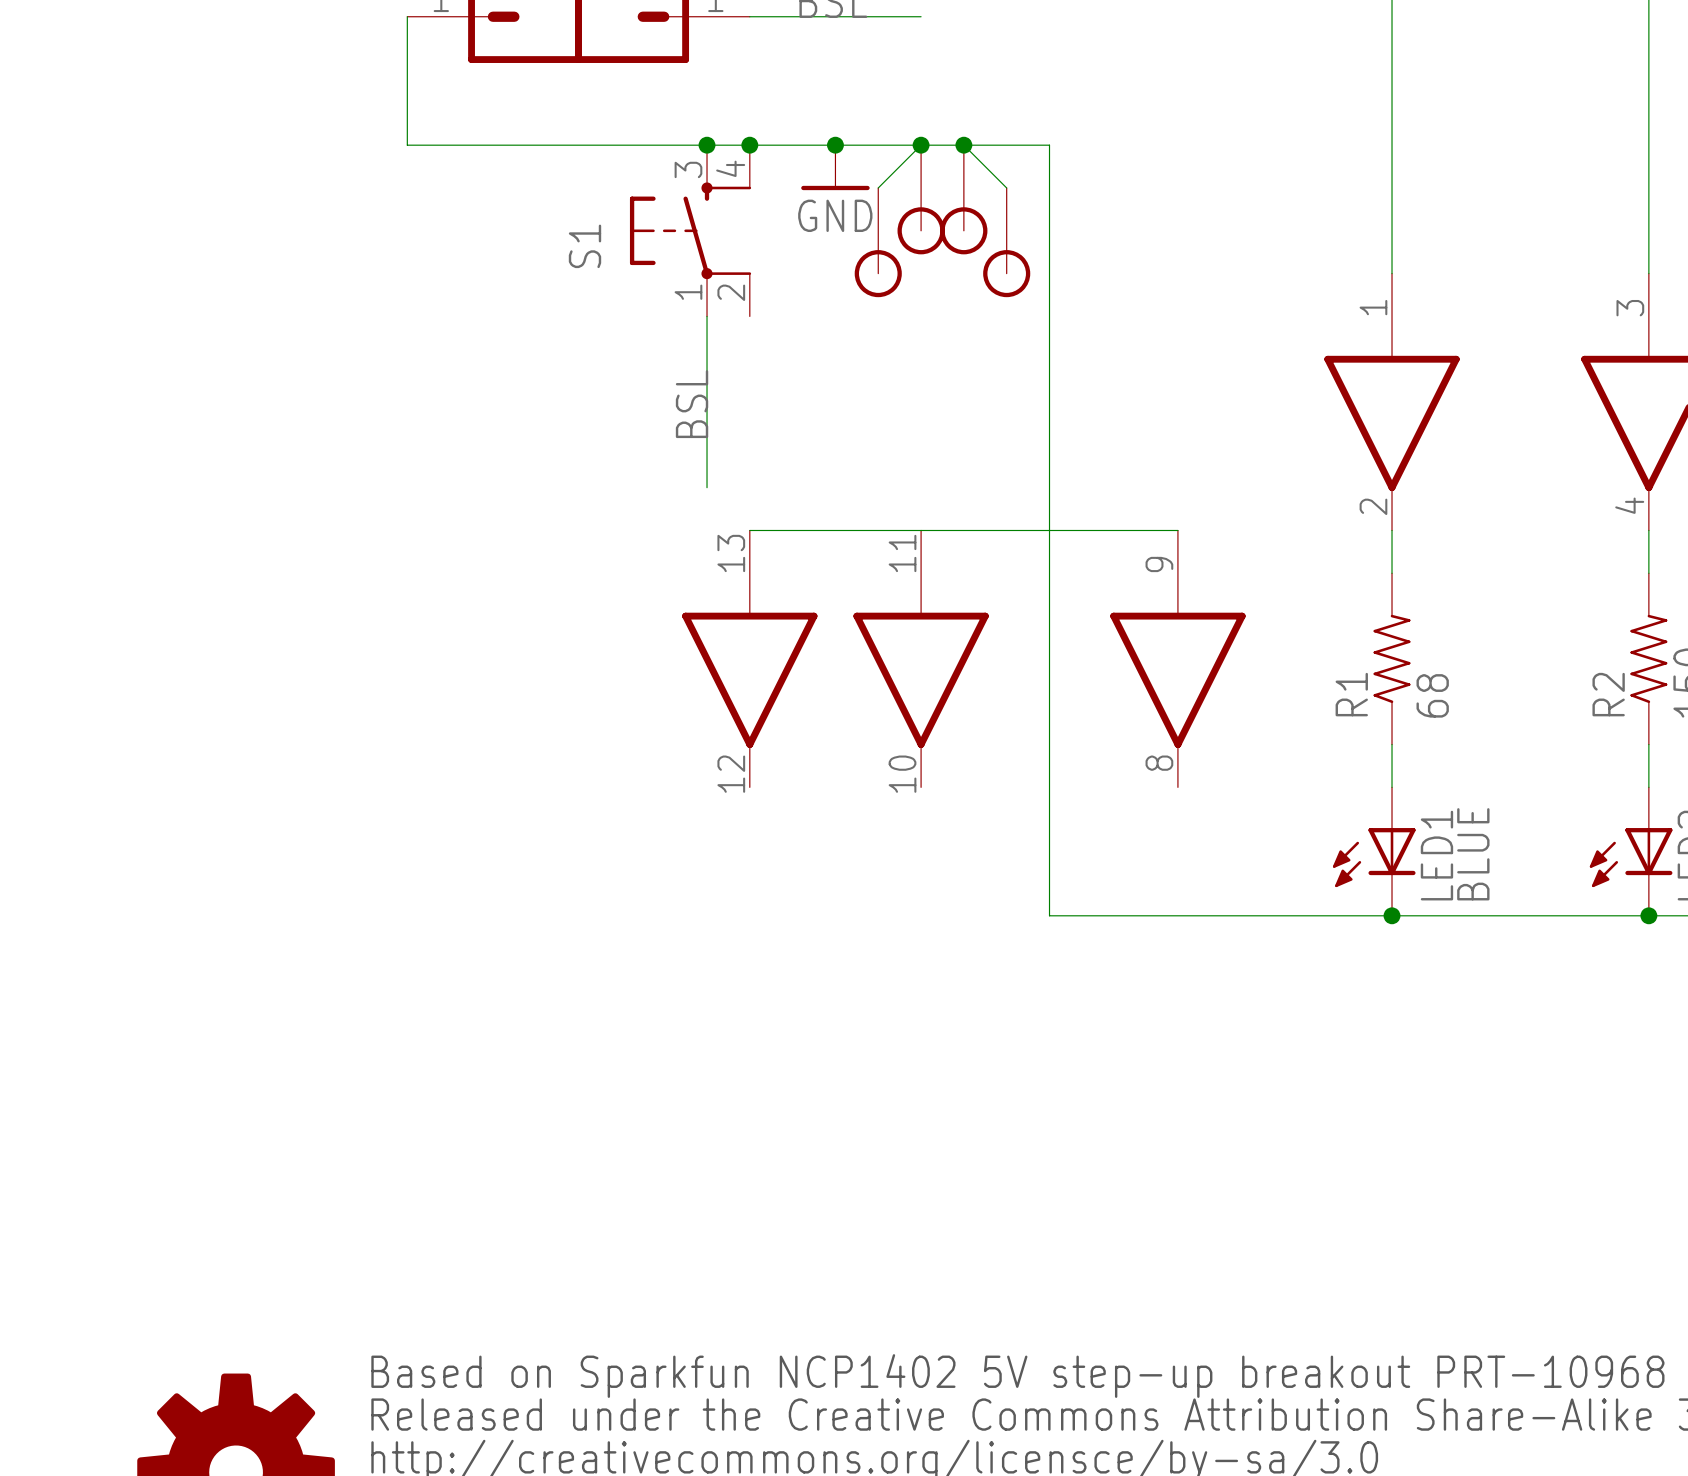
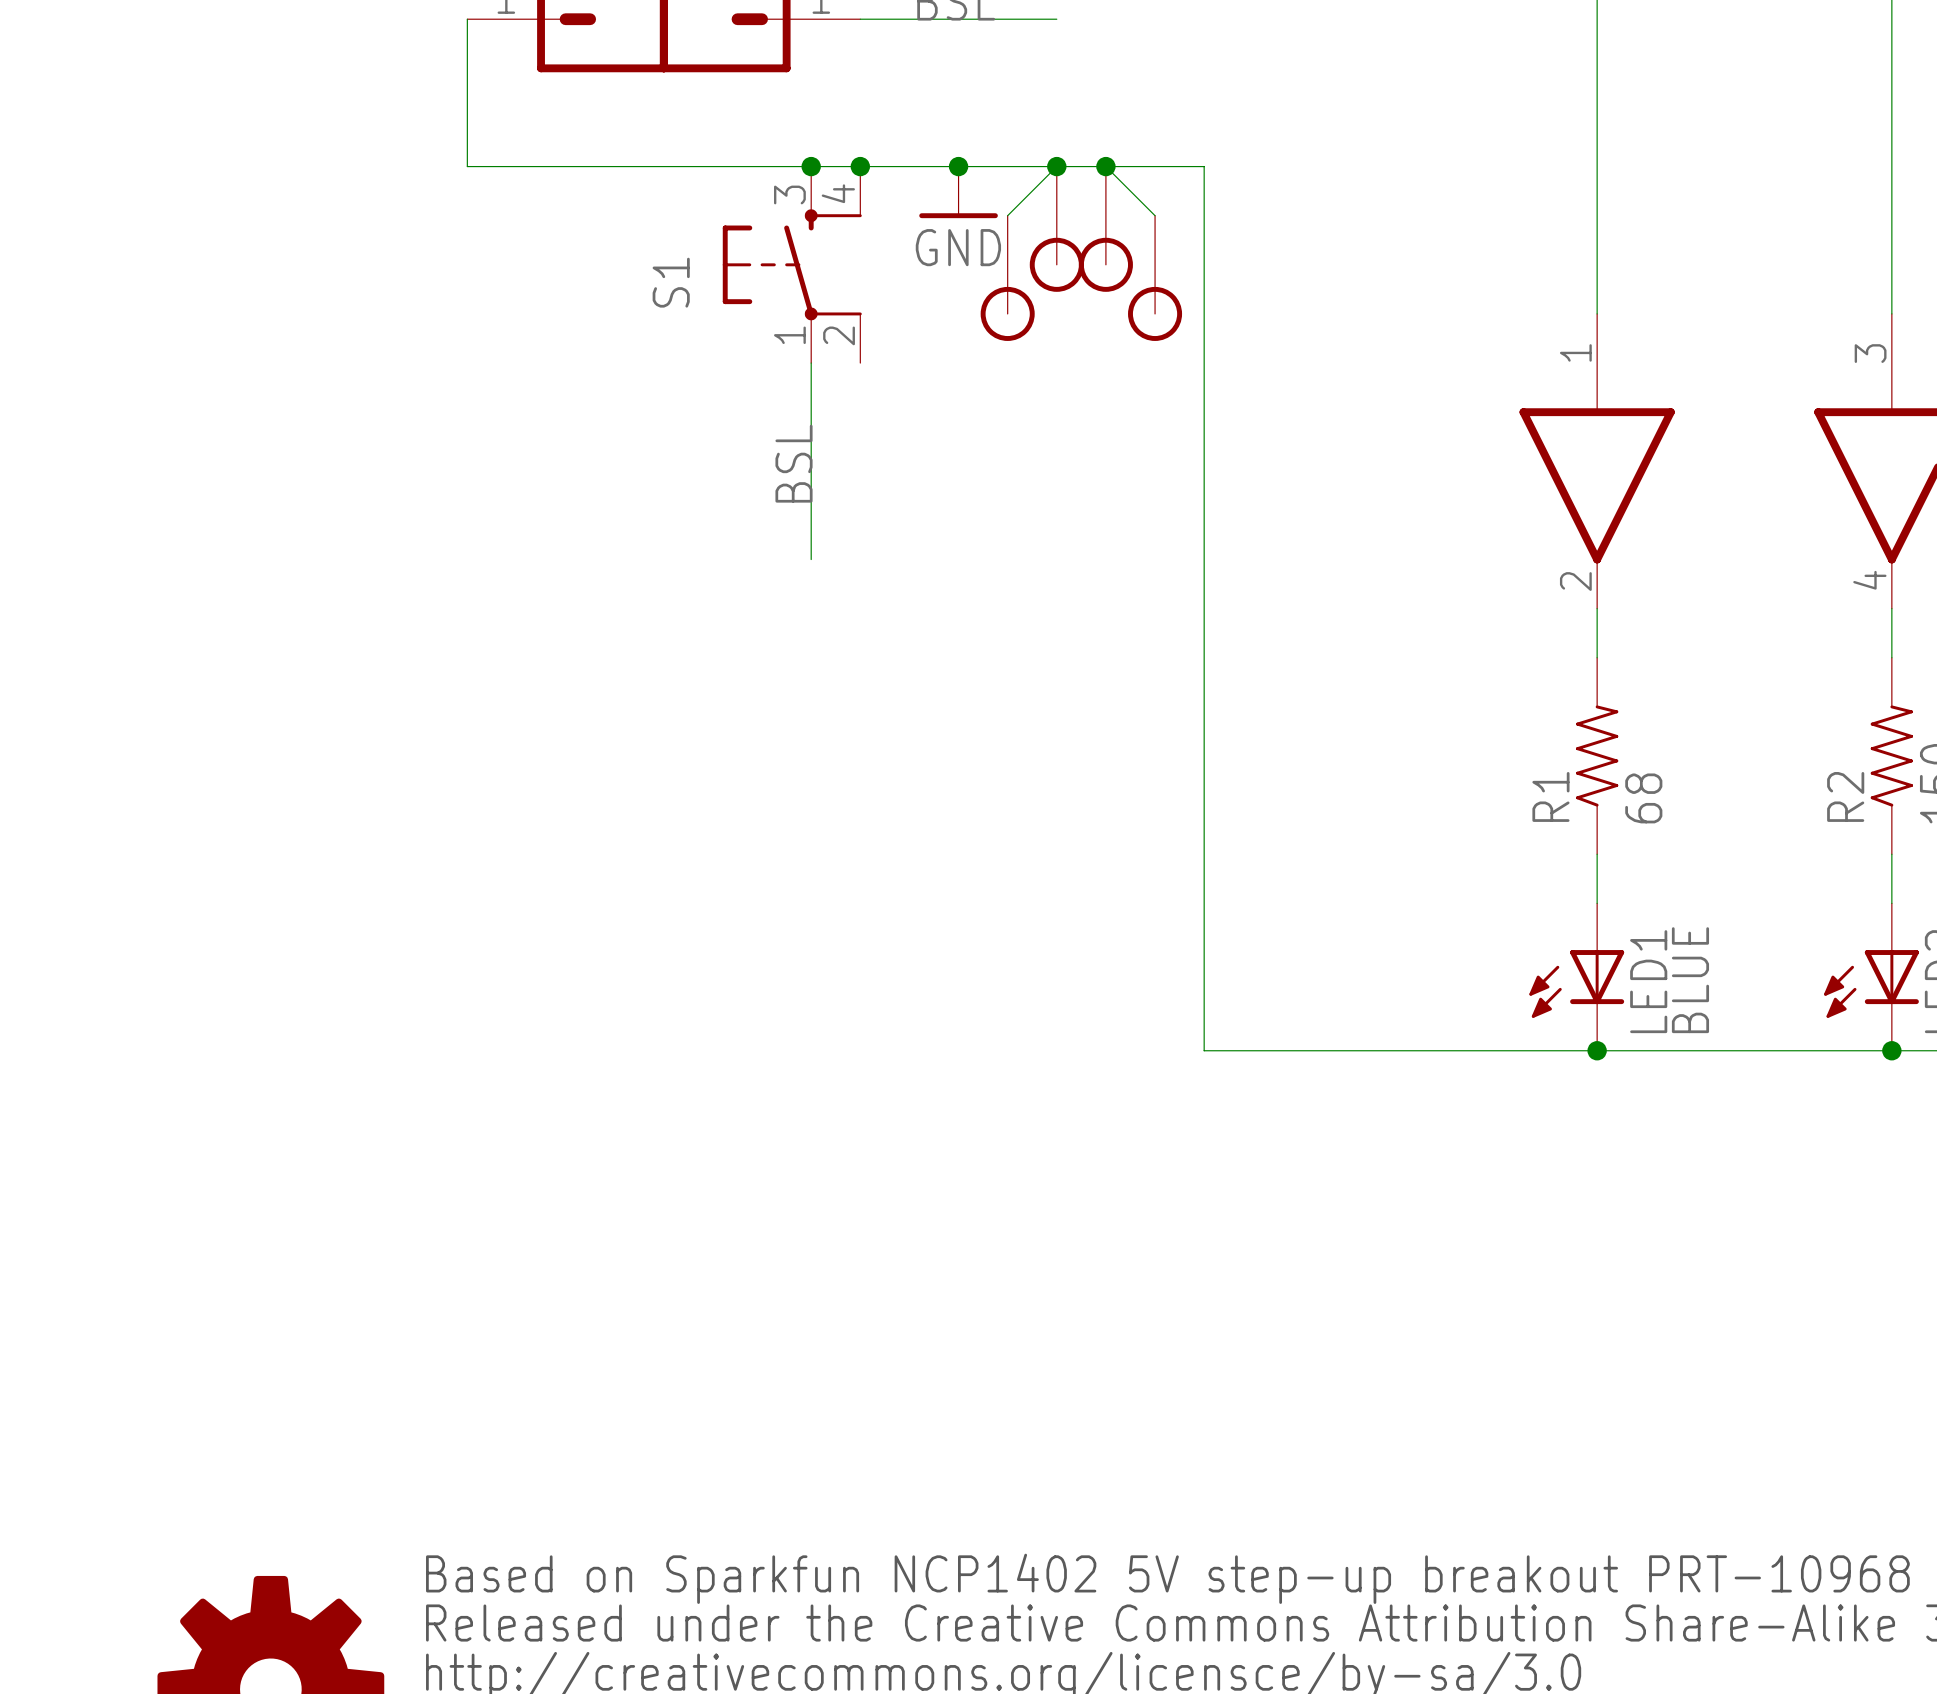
wire: (749, 530) (1177, 530) -> none
part: (749, 658) -> none
part: (921, 658) -> none
part: (1177, 658) -> none

